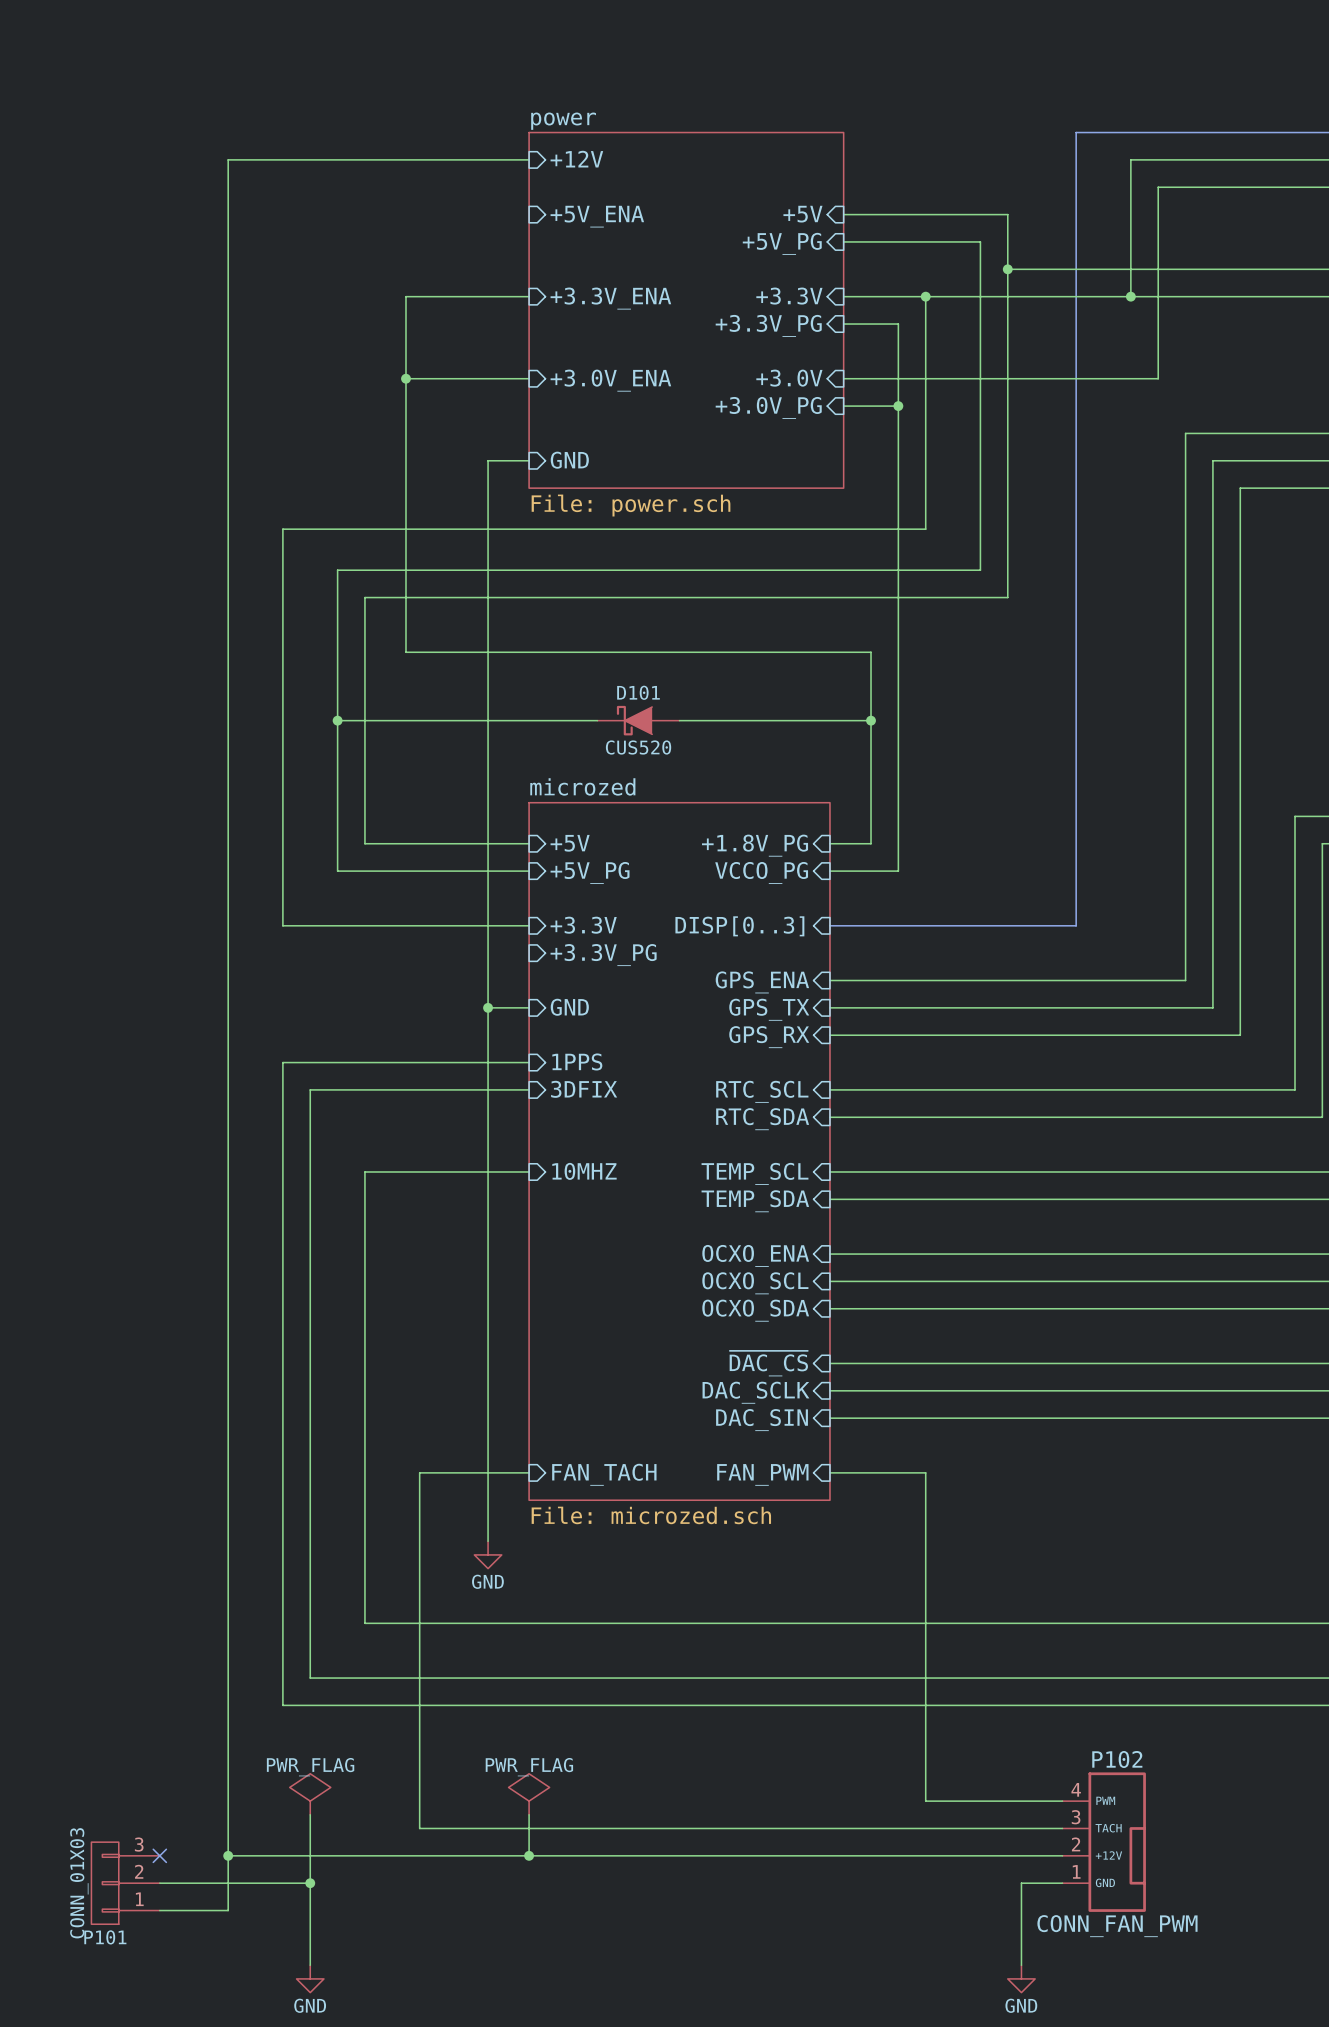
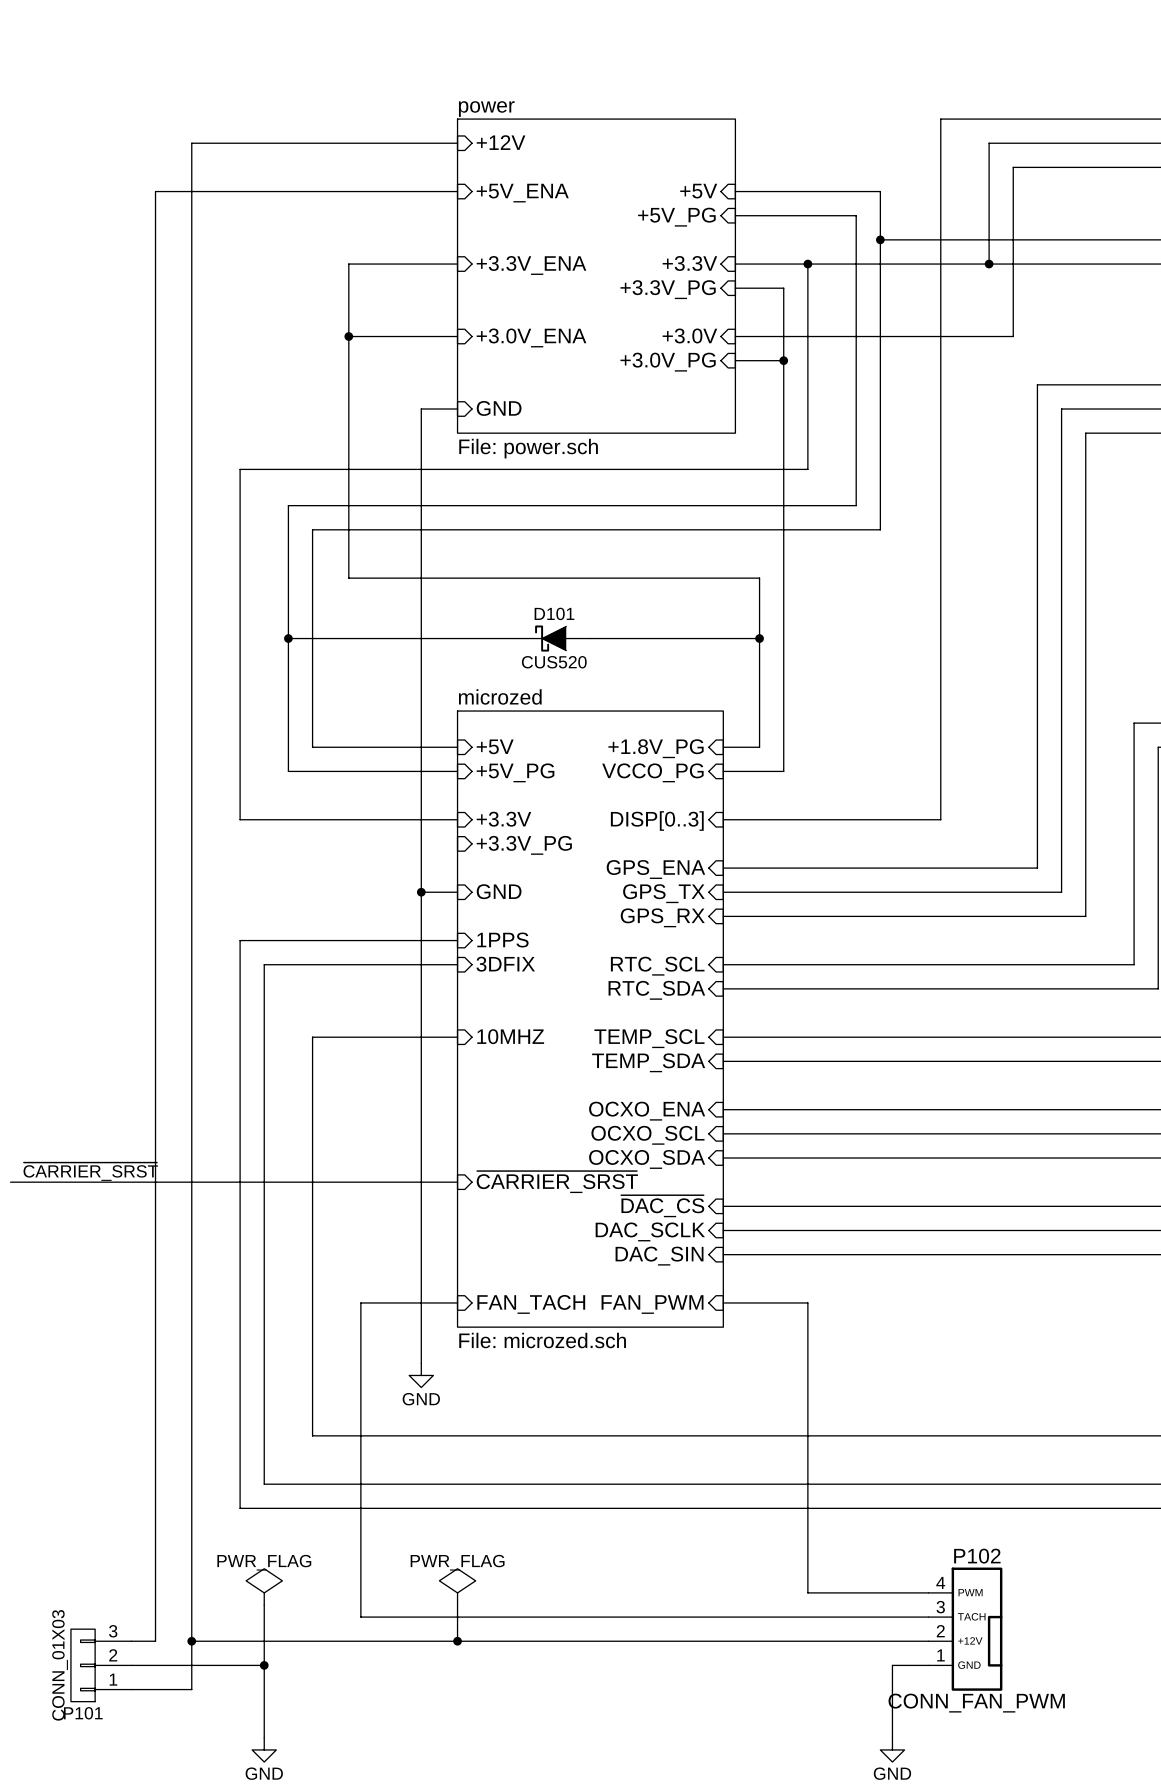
wire: none -> (457, 191) (155, 191) (155, 1641) (131, 1641)
label: none -> ~{CARRIER_SRST} (90, 1171)
wire: none -> (10, 1182) (457, 1182)
sheet pin: none -> ~{CARRIER_SRST} (557, 1182)
no-connect mark: (159, 1855) -> none

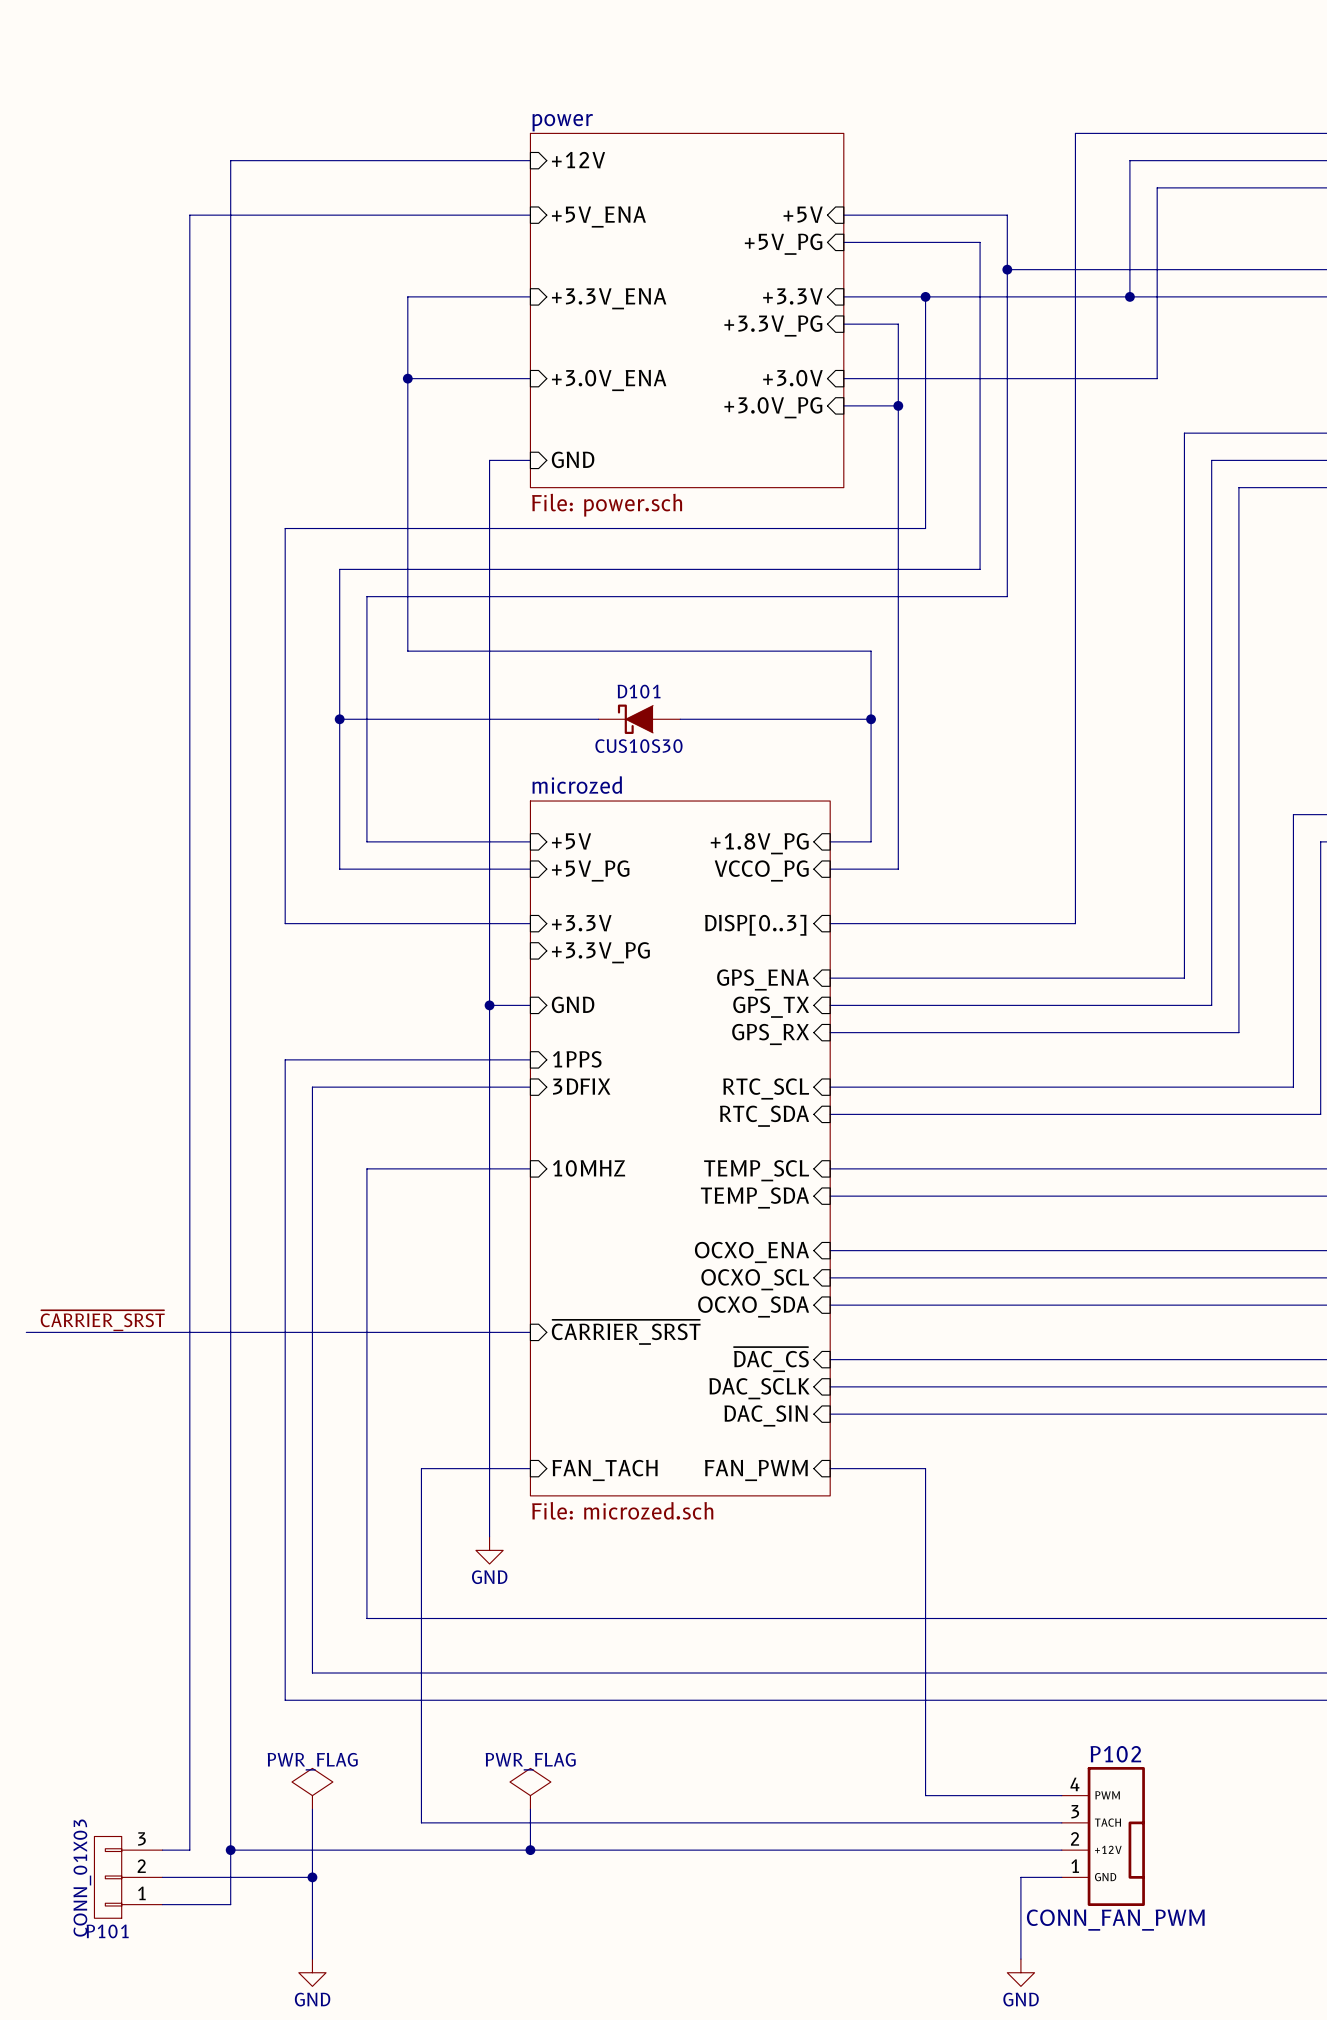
D101 value: CUS520 (554, 662) -> CUS10S30 (638, 746)

